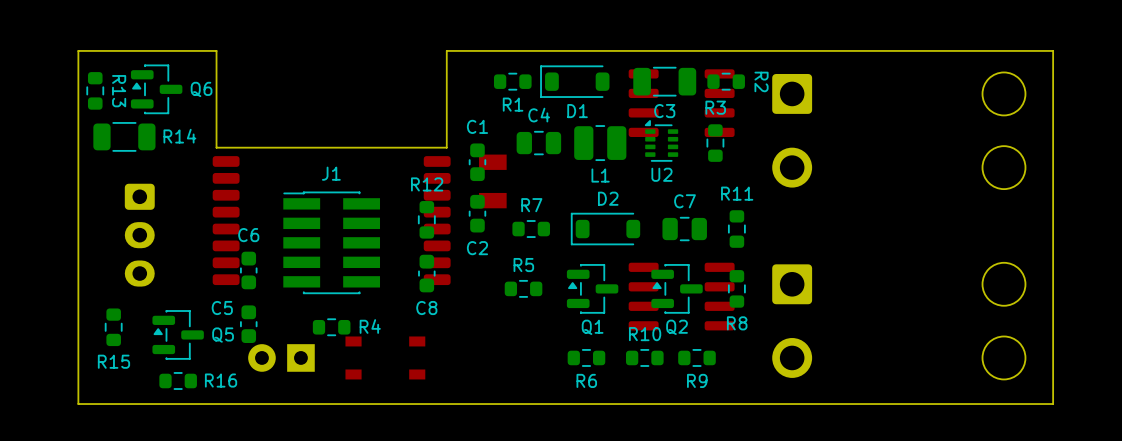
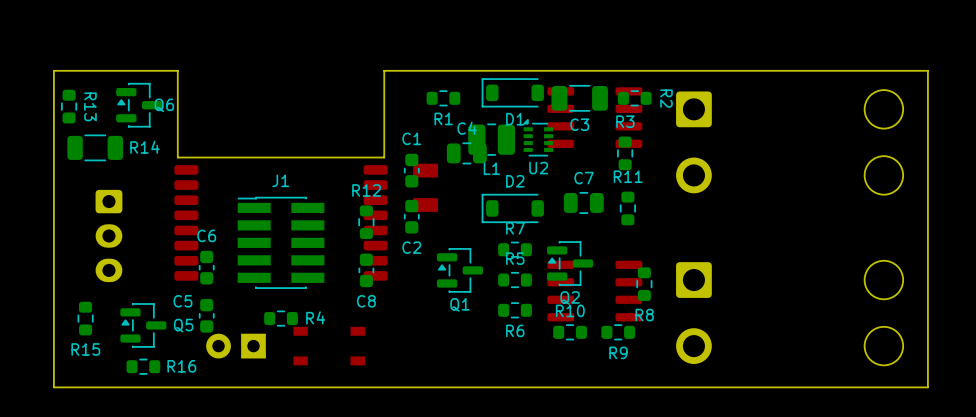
D1 position: (574, 81) -> (512, 92)
Q6 position: (156, 89) -> (139, 105)
U2 position: (661, 140) -> (538, 137)
L1 position: (600, 143) -> (491, 139)
R7 position: (531, 229) -> (515, 249)
D2 position: (605, 229) -> (512, 208)
C7 position: (684, 229) -> (583, 202)
R11 position: (736, 229) -> (627, 208)
R5 position: (523, 288) -> (515, 280)
Q1 position: (592, 288) -> (459, 270)
Q2 position: (677, 288) -> (570, 263)
R6 position: (586, 357) -> (515, 310)
R10 position: (644, 357) -> (570, 332)
R9 position: (696, 357) -> (618, 332)

